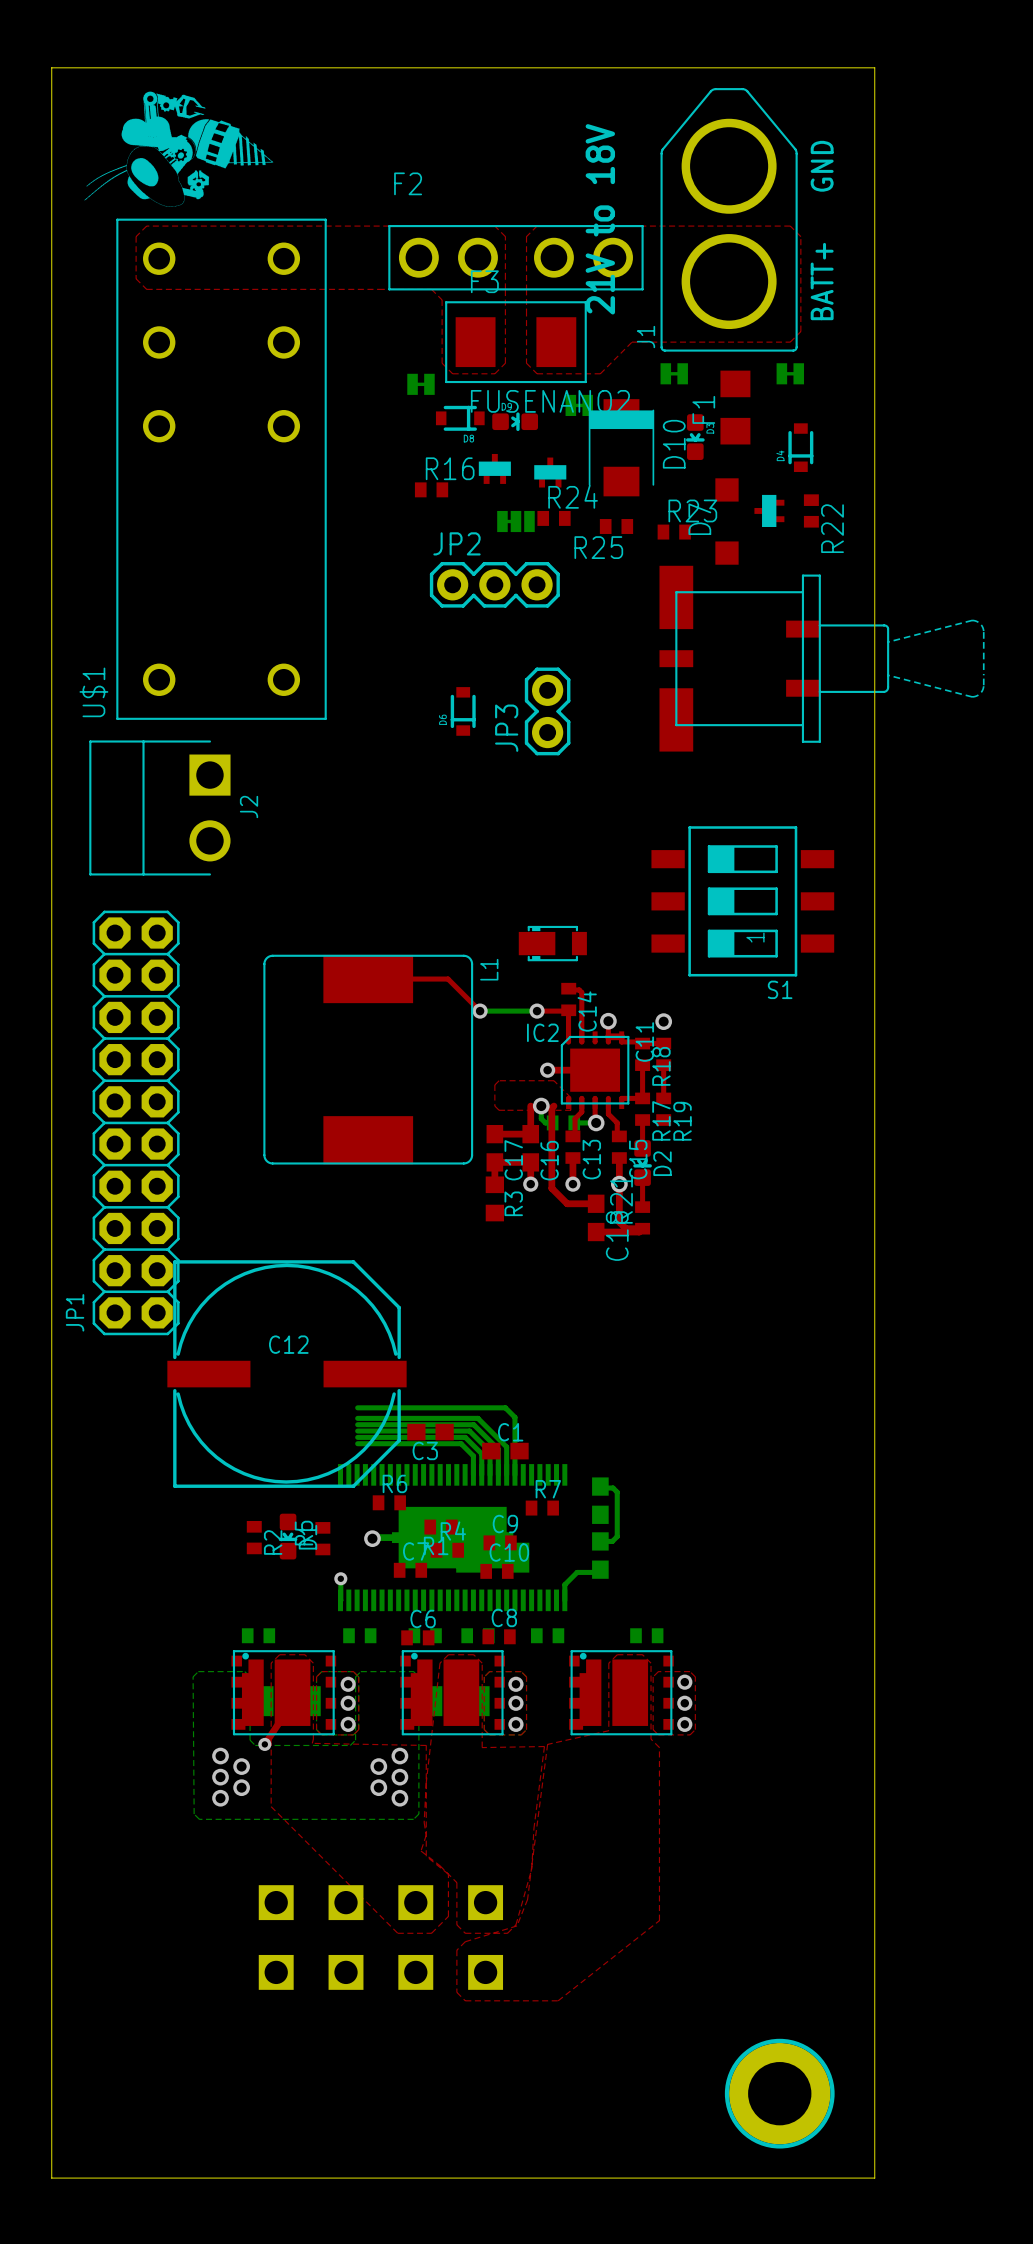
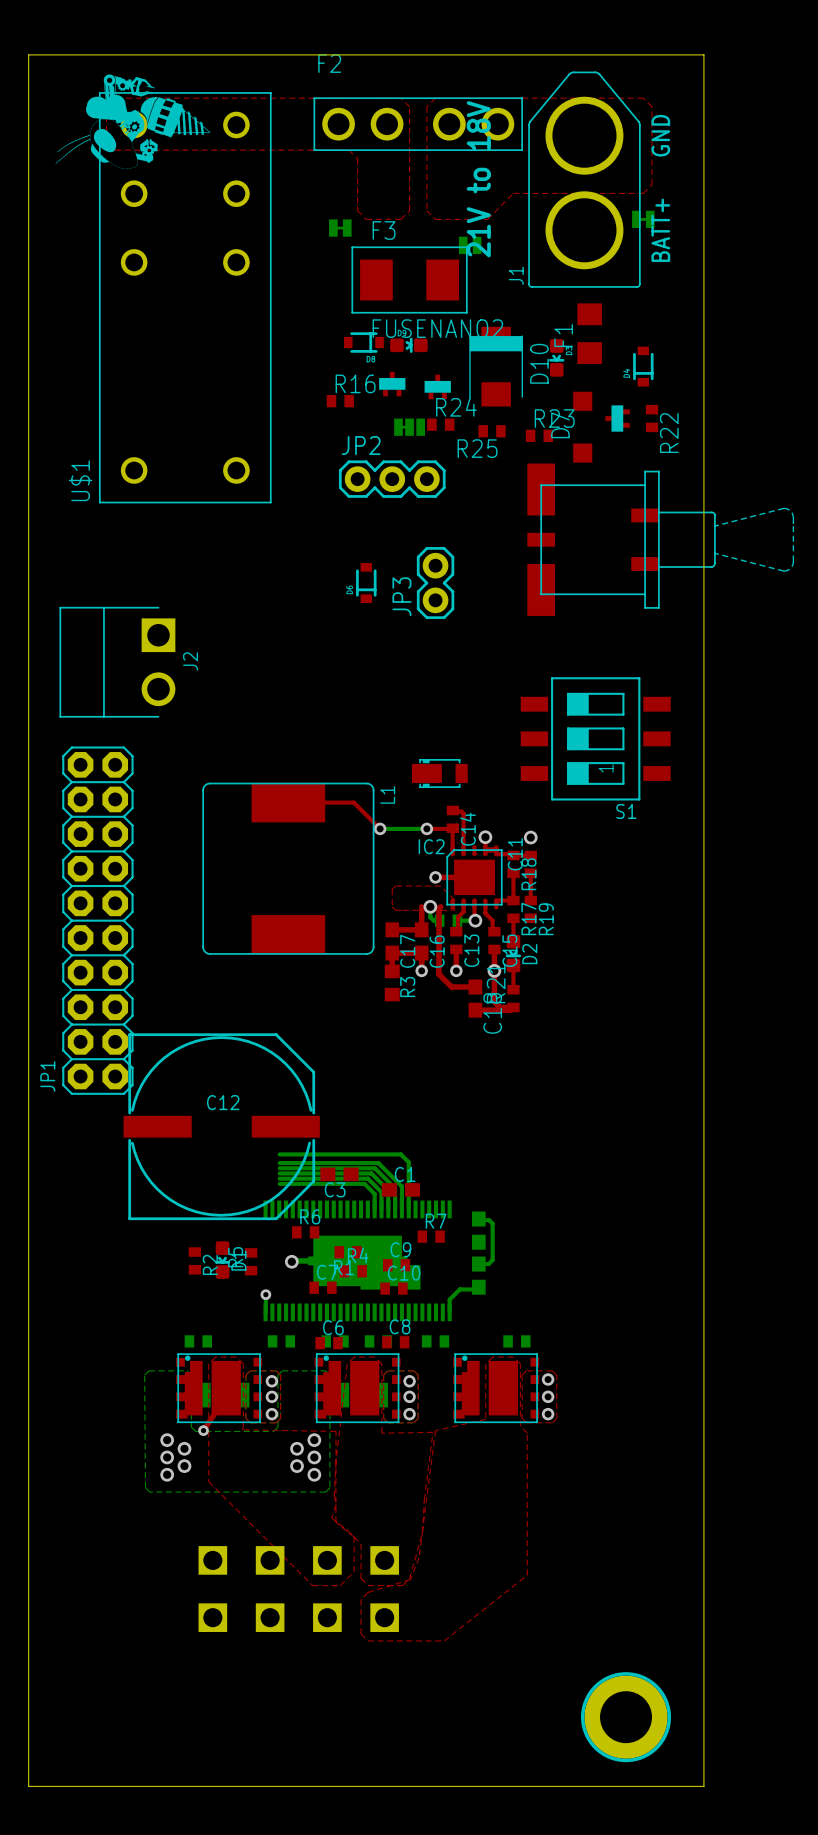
top zone outline: (146, 226) (494, 226) (505, 236) (505, 363) (494, 373) (452, 373) (442, 363) (442, 299) (431, 289) (146, 289) (136, 278) (136, 236) (146, 226) -> (115, 98) (400, 98) (409, 106) (409, 210) (400, 219) (366, 219) (357, 210) (357, 158) (348, 150) (115, 150) (106, 141) (106, 106) (115, 98)
top zone outline: (537, 226) (790, 226) (800, 236) (800, 331) (790, 342) (632, 342) (600, 373) (537, 373) (526, 363) (526, 236) (537, 226) -> (435, 98) (643, 98) (651, 106) (651, 184) (643, 193) (513, 193) (487, 219) (435, 219) (426, 210) (426, 106) (435, 98)
F2 position: (515, 257) -> (418, 124)
part: none -> (643, 219)
part: none -> (340, 228)
part: none -> (470, 245)
part: (674, 373) -> none
part: (790, 373) -> none
part: (421, 384) -> none
part: (579, 405) -> none
U$1 position: (221, 469) -> (185, 297)

